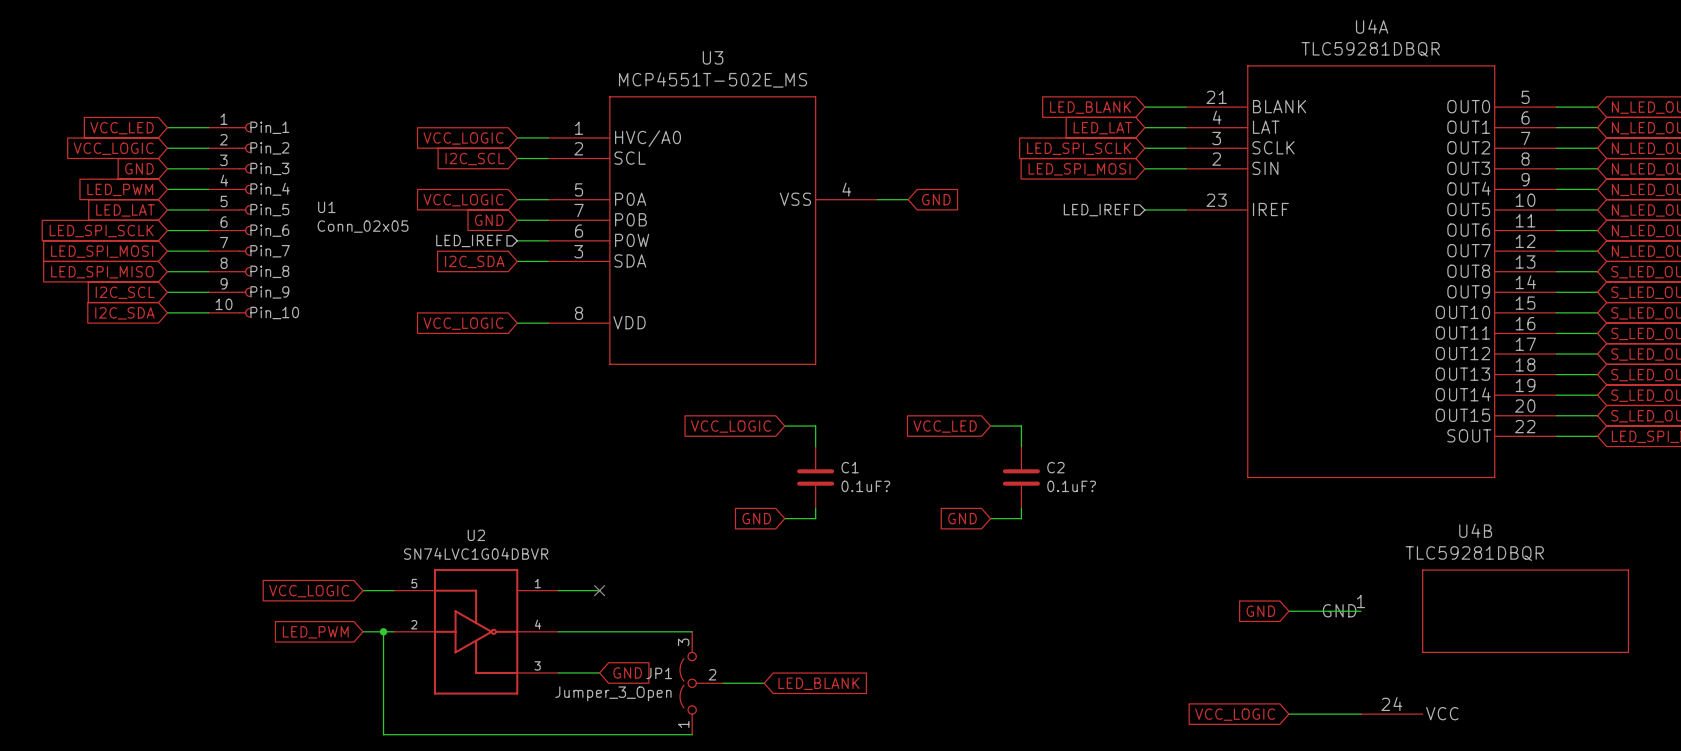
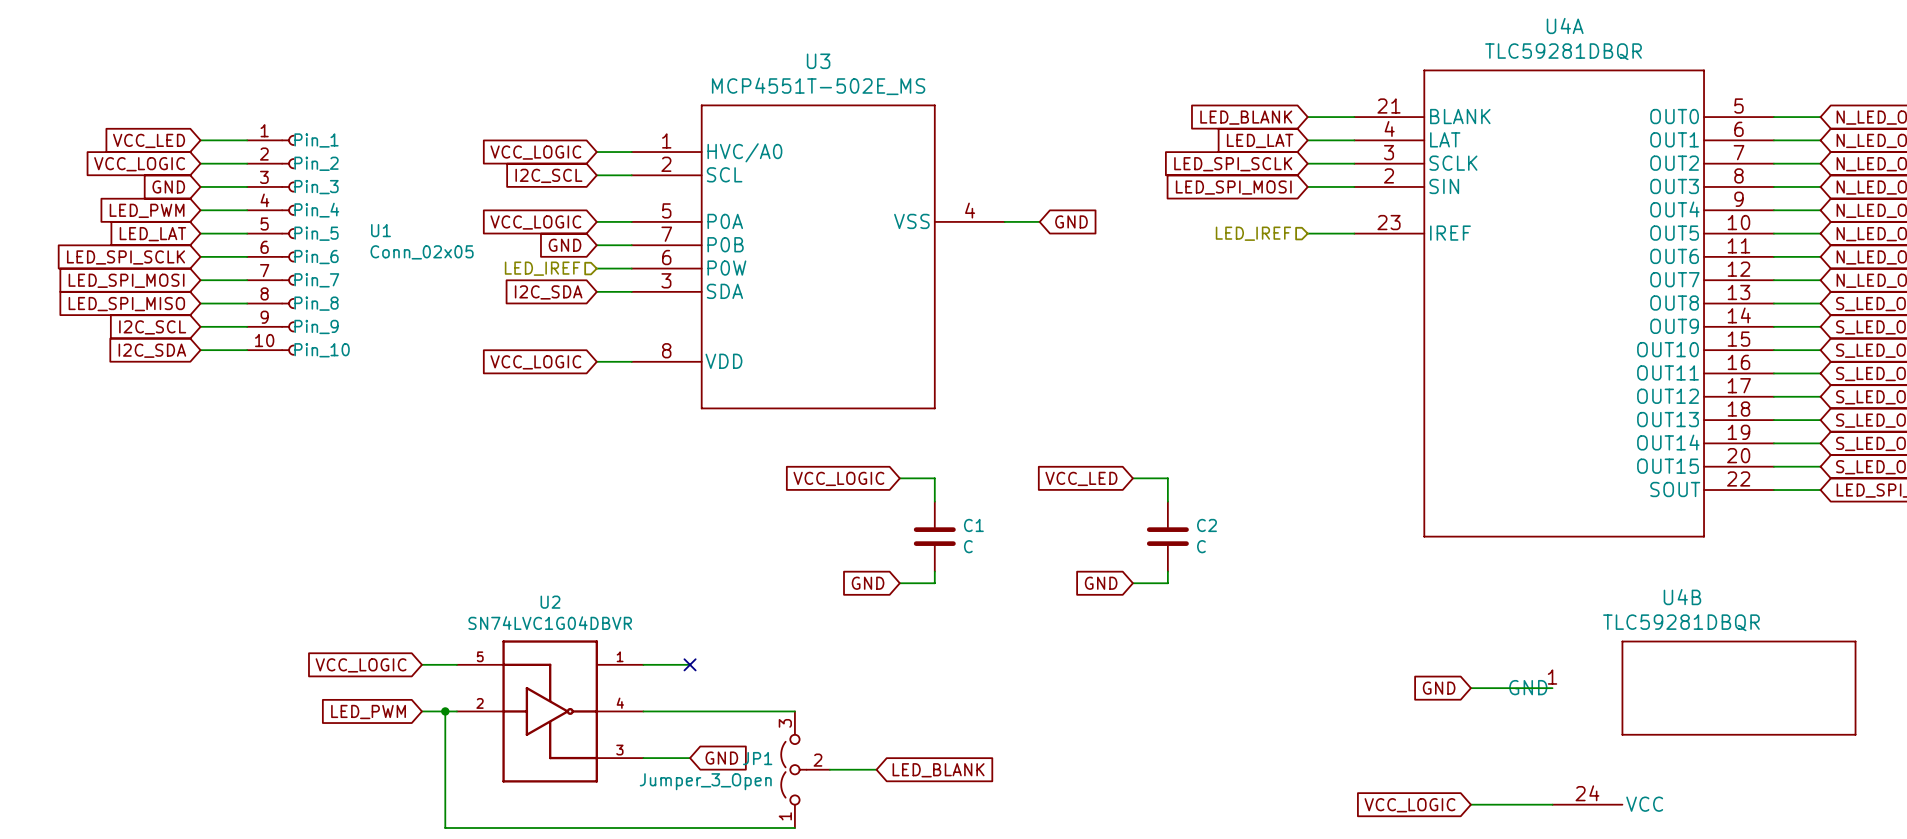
C1 value: 0.1uF? (865, 486) -> C (968, 546)
C2 value: 0.1uF? (1071, 486) -> C (1201, 546)

